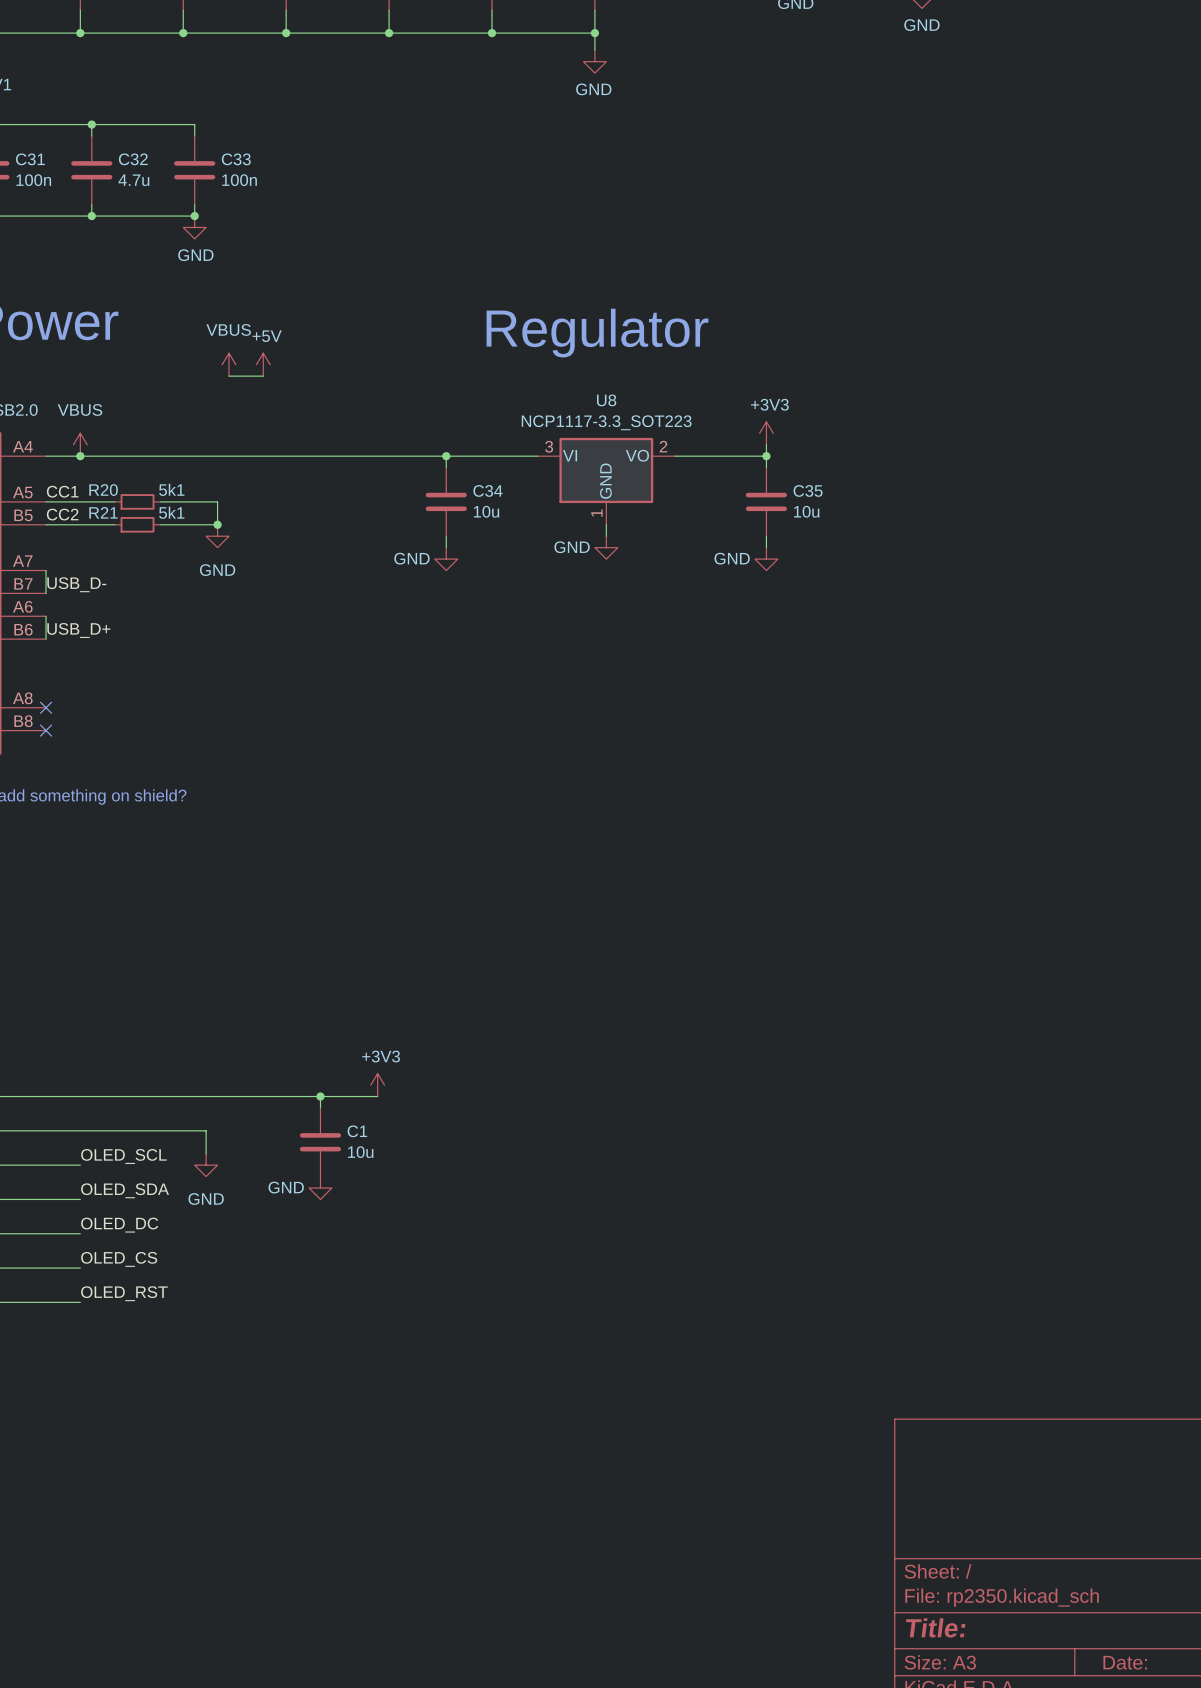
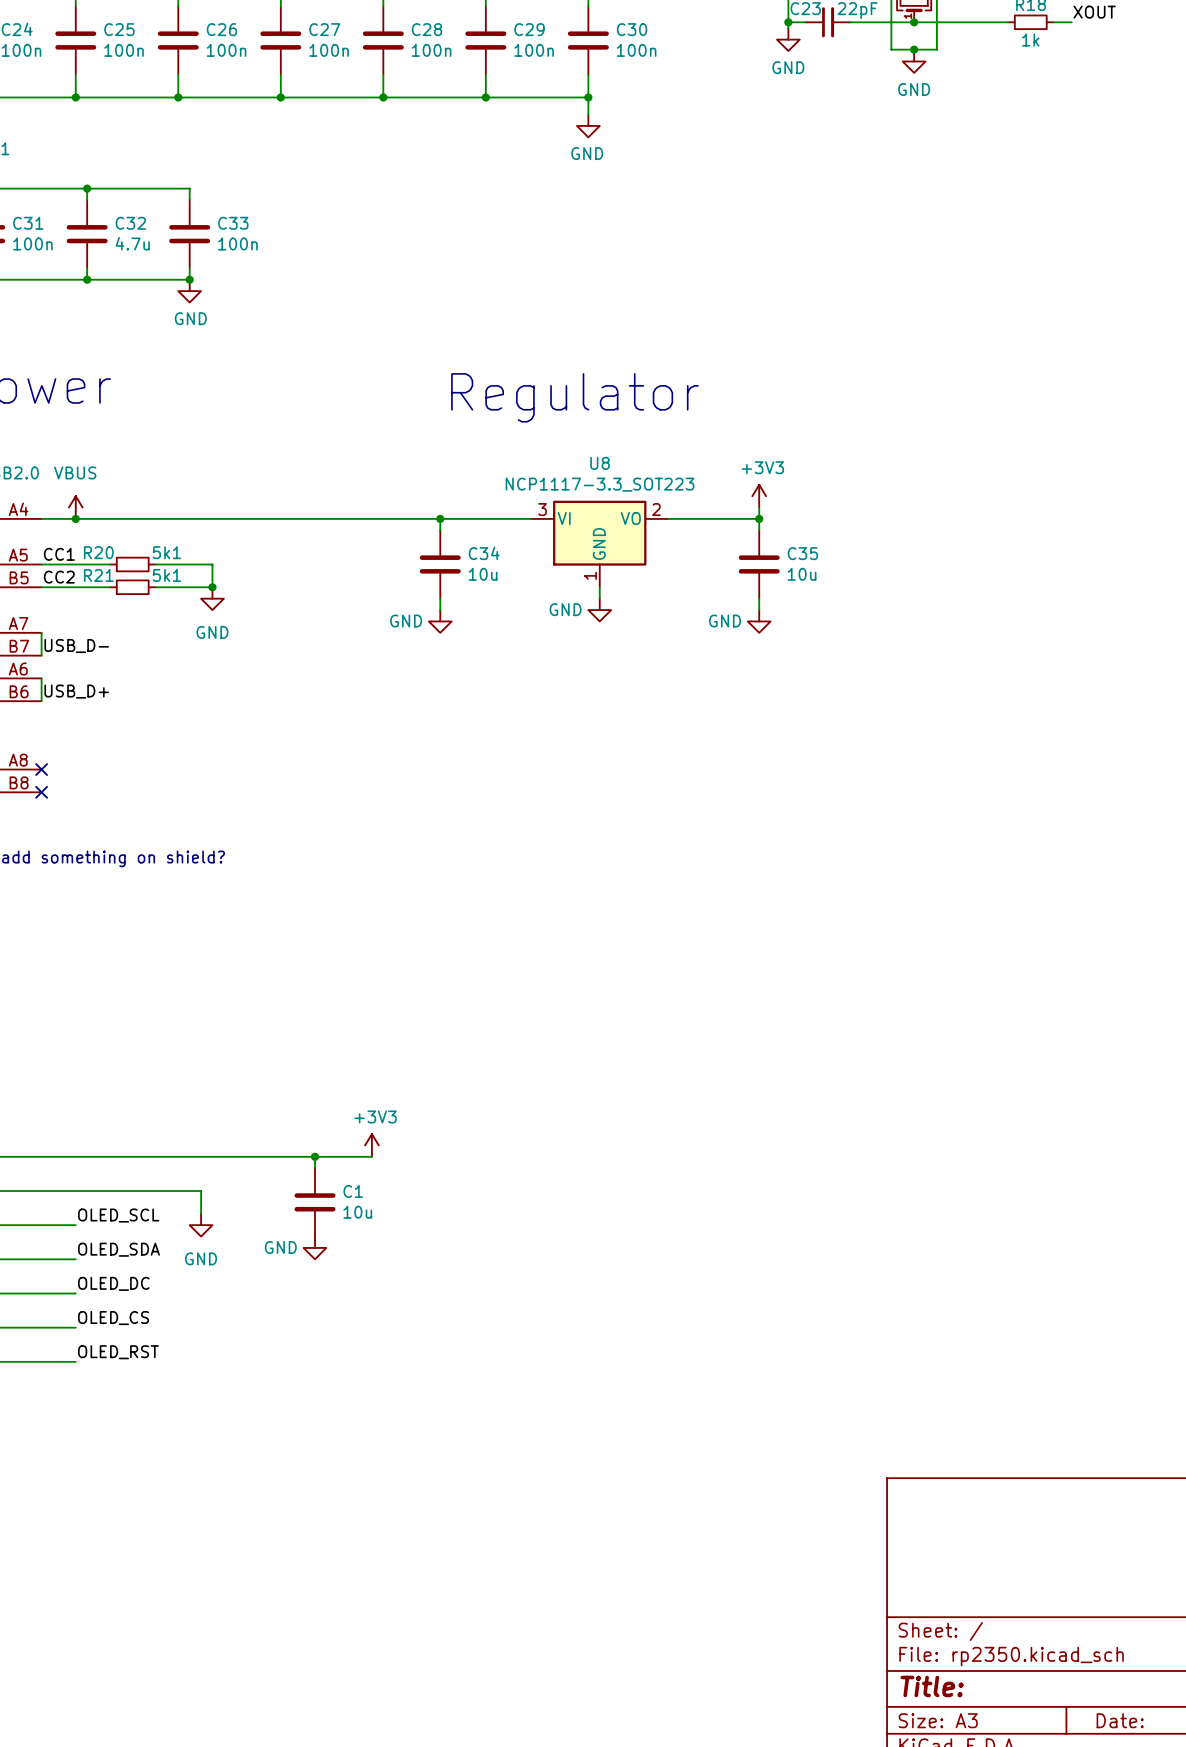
power symbol: VBUS (229, 364) -> none
power symbol: +5V (263, 364) -> none
wire: (229, 376) (263, 376) -> none

